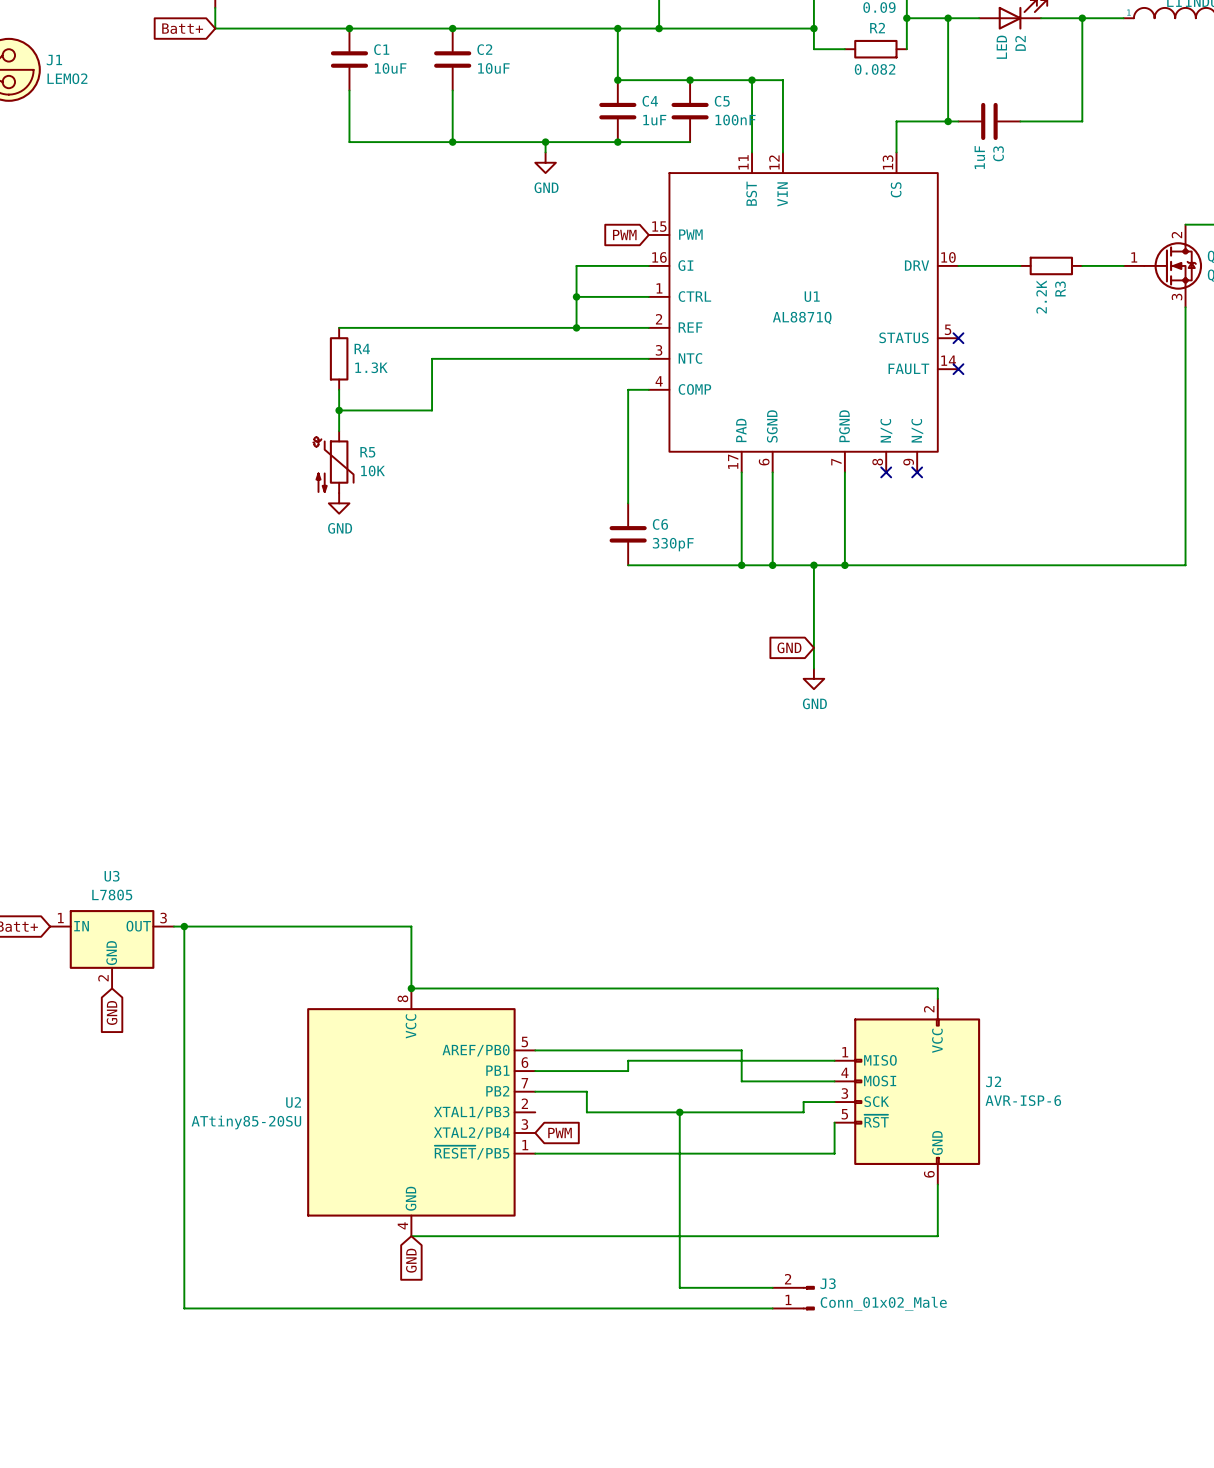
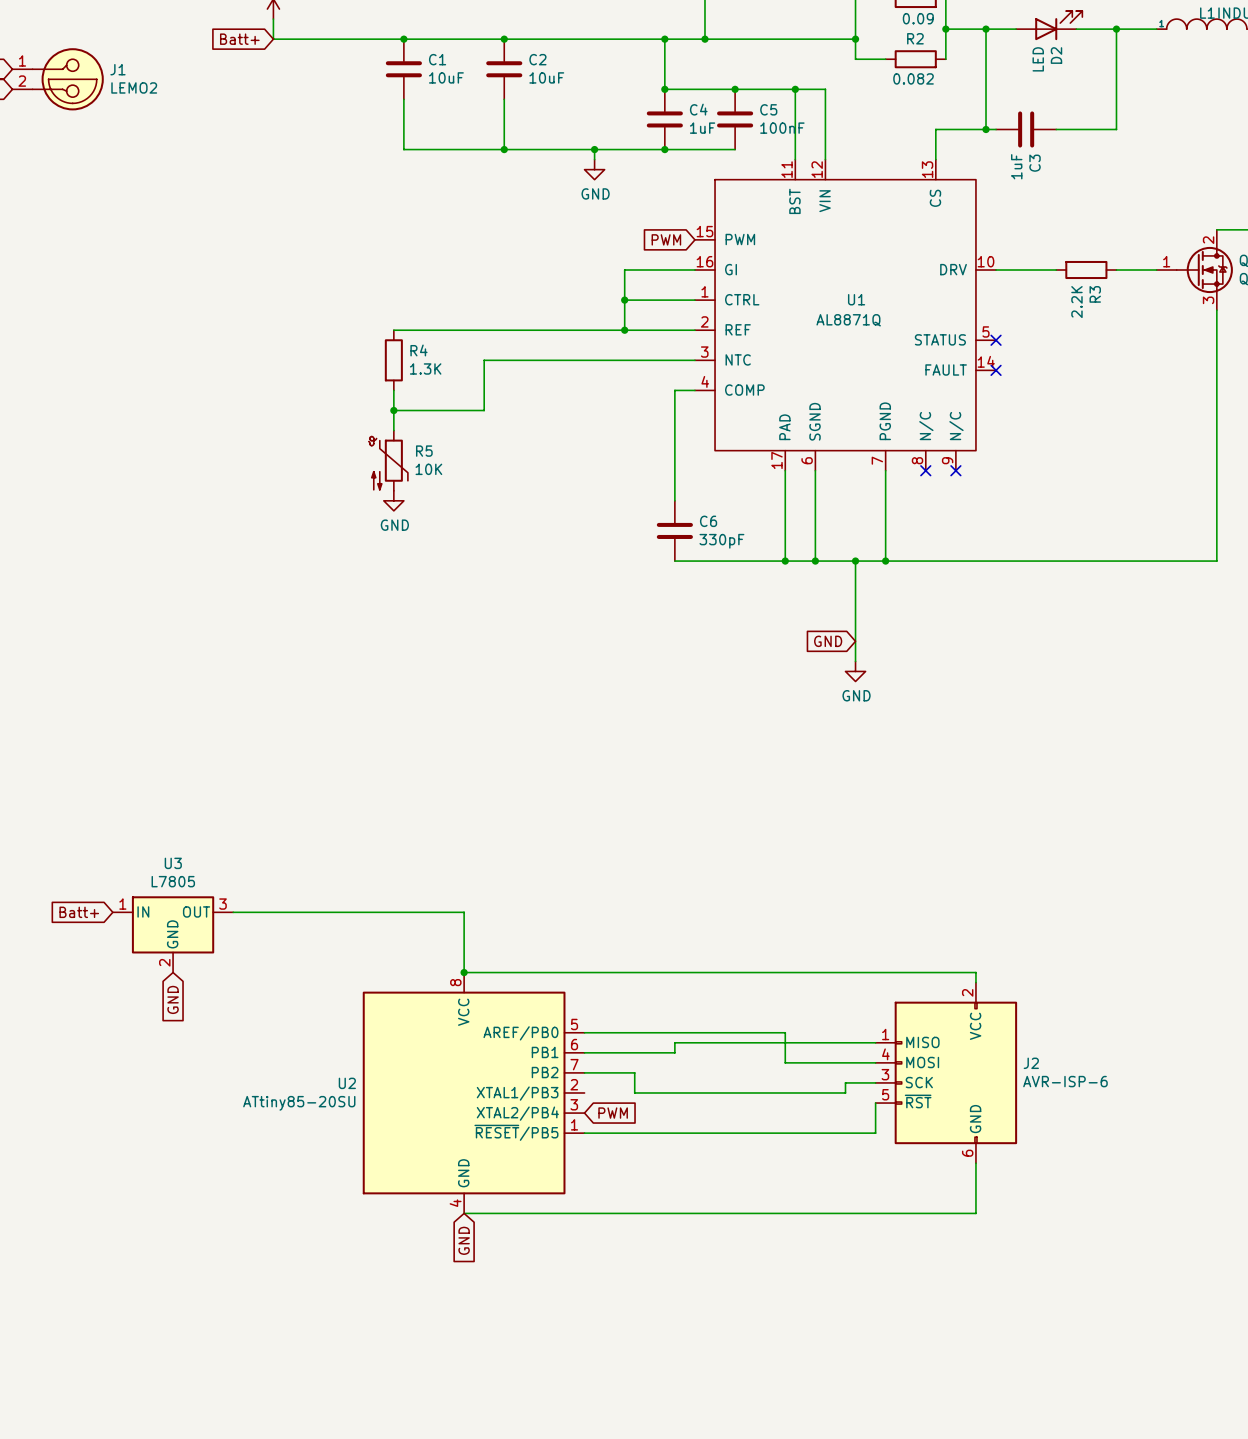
wire: (184, 926) (184, 1308) (772, 1308) -> none
junction: (184, 926) -> none
wire: (679, 1112) (679, 1287) (772, 1287) -> none
junction: (679, 1112) -> none
J3: Conn_01x02_Male (793, 1298) -> none

